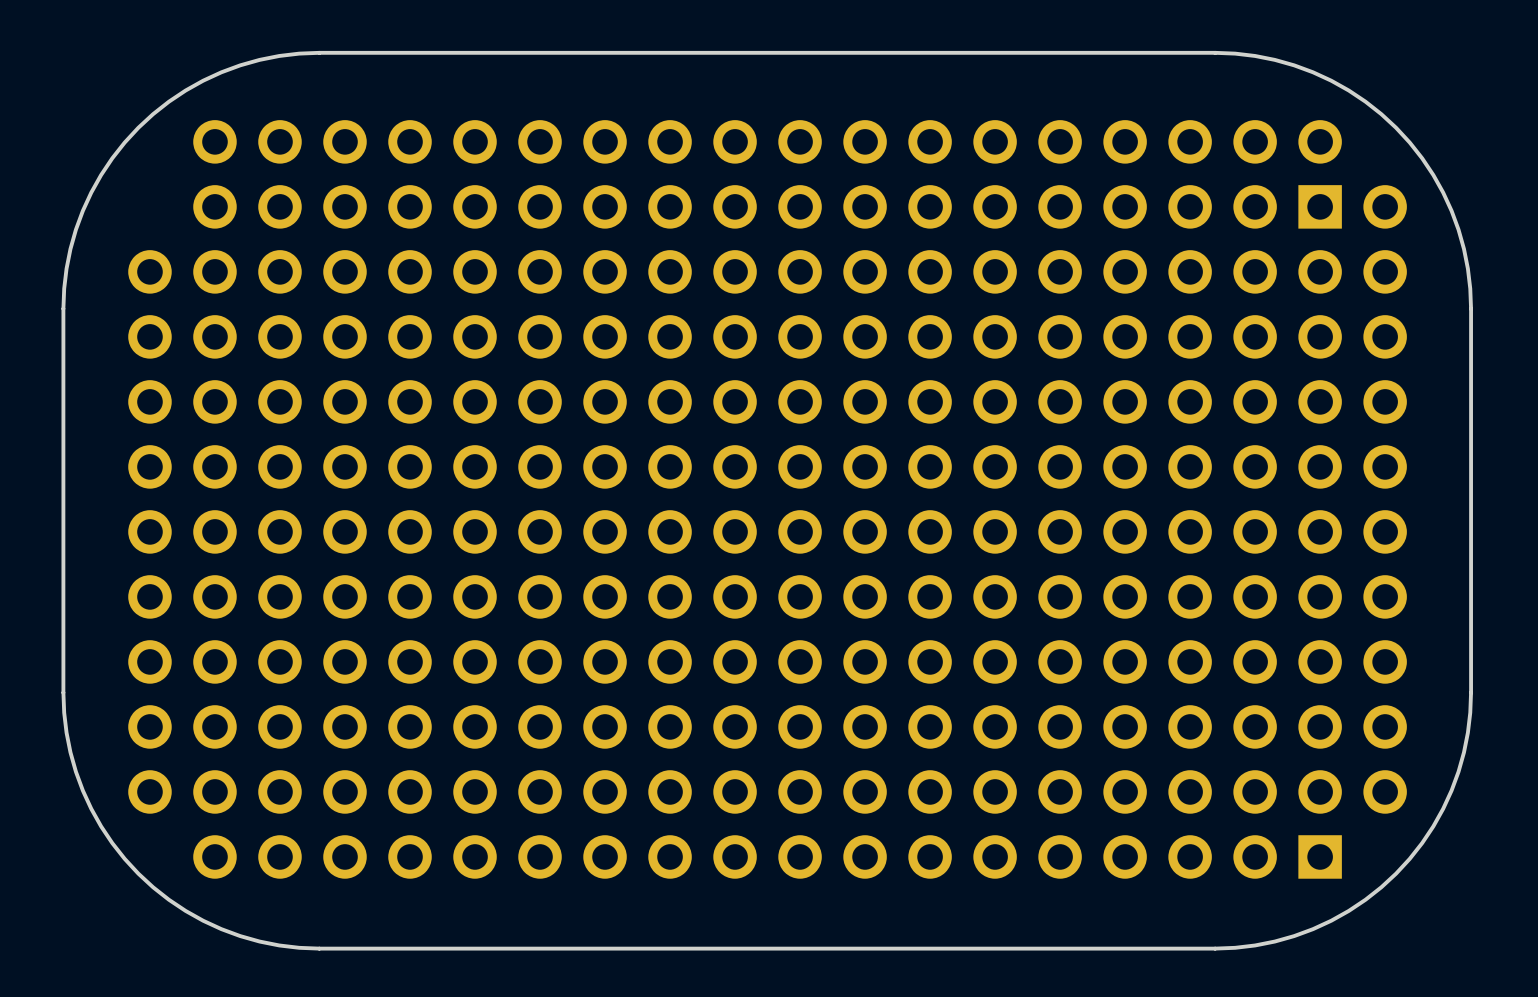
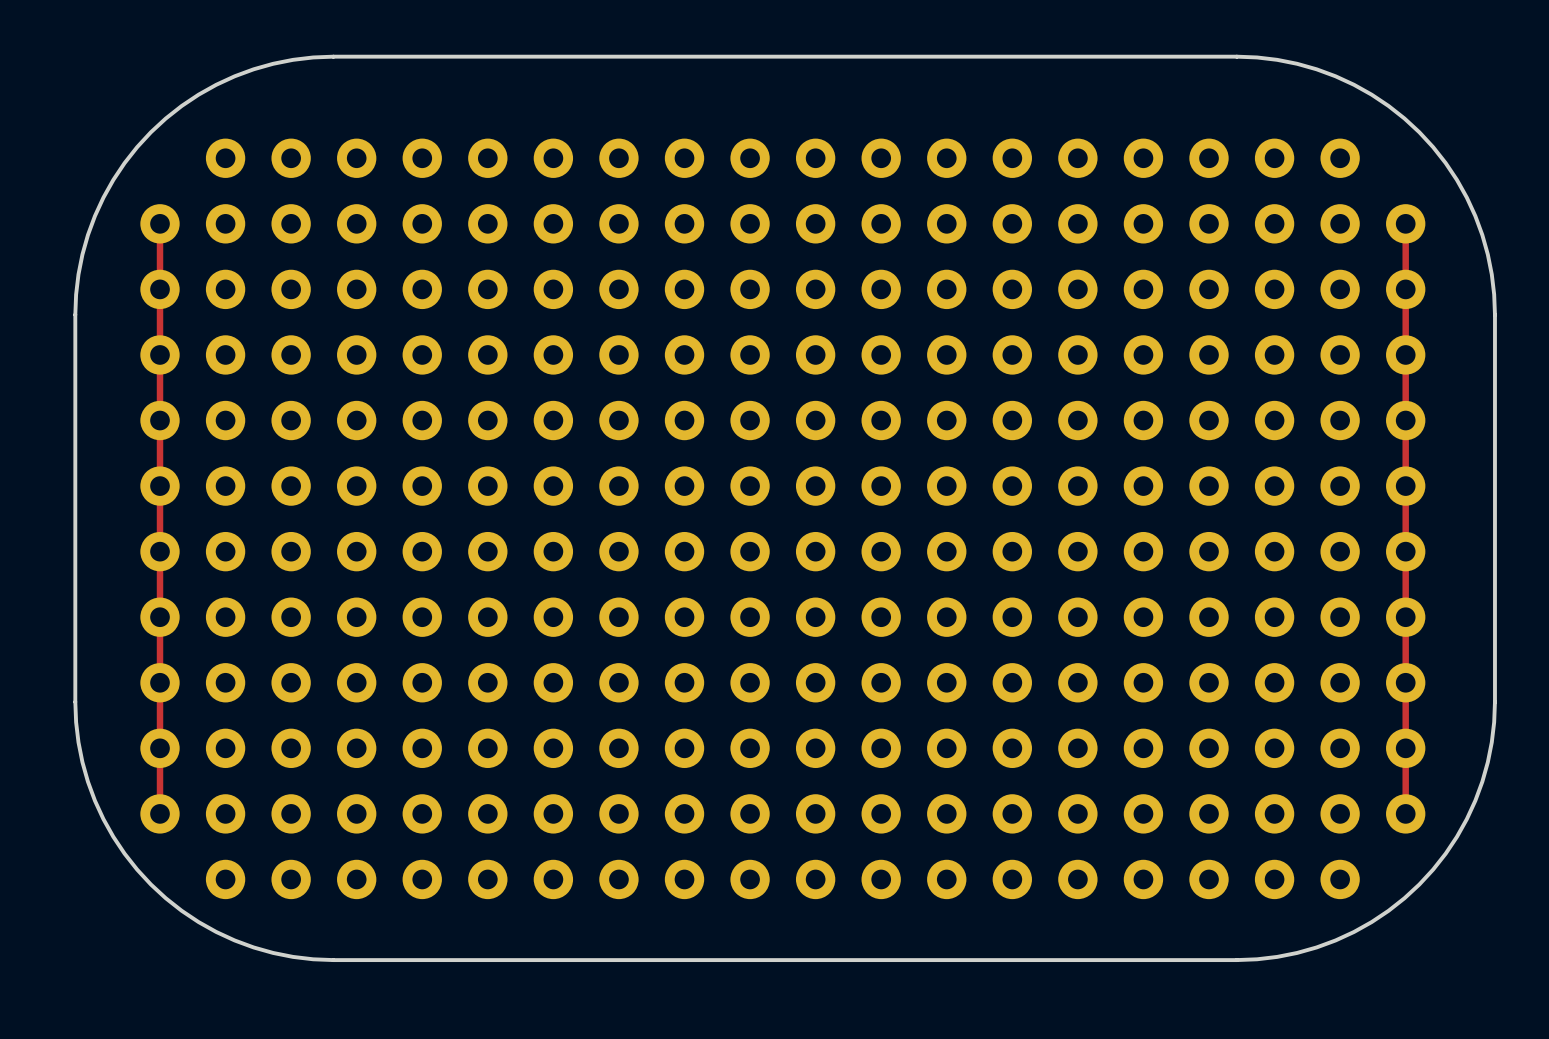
part: (767, 141) -> none
part footprint: [193, 185, 1342, 229] -> [205, 138, 1360, 244]
part footprint: [1363, 185, 1407, 814] -> [1386, 400, 1426, 637]
top track: none -> (160, 223) (160, 813)
part: none -> (160, 223)
top track: none -> (1405, 223) (1405, 813)
part: none -> (1405, 223)
part footprint: [128, 250, 172, 814] -> [140, 400, 180, 637]
part footprint: [193, 250, 237, 749] -> [205, 400, 246, 637]
part footprint: [258, 250, 302, 749] -> [271, 400, 311, 637]
part footprint: [323, 250, 367, 749] -> [337, 400, 377, 637]
part footprint: [388, 250, 432, 749] -> [402, 400, 442, 637]
part footprint: [453, 250, 497, 749] -> [468, 400, 508, 637]
part footprint: [518, 250, 562, 749] -> [533, 400, 574, 637]
part footprint: [583, 250, 627, 749] -> [599, 400, 639, 637]
part footprint: [648, 250, 692, 749] -> [664, 400, 705, 637]
part footprint: [713, 250, 757, 749] -> [730, 400, 770, 637]
part footprint: [778, 250, 822, 749] -> [795, 400, 836, 637]
part footprint: [843, 250, 887, 749] -> [861, 400, 901, 637]
part footprint: [908, 250, 952, 749] -> [927, 400, 967, 637]
part footprint: [973, 250, 1017, 749] -> [992, 400, 1032, 637]
part footprint: [1038, 250, 1082, 749] -> [1058, 400, 1098, 637]
part footprint: [1103, 250, 1147, 749] -> [1123, 400, 1164, 637]
part footprint: [1168, 250, 1212, 749] -> [1189, 400, 1229, 637]
part footprint: [1233, 250, 1277, 749] -> [1254, 400, 1295, 637]
part footprint: [1298, 250, 1342, 749] -> [1320, 400, 1360, 637]
part: none -> (160, 322)
part: none -> (782, 322)
part: none -> (1405, 322)
part: none -> (160, 715)
part: none -> (782, 715)
part: none -> (1405, 715)
part: (767, 791) -> none
part: none -> (160, 813)
part: none -> (1405, 813)
part footprint: [193, 835, 1342, 879] -> [205, 794, 1360, 900]

